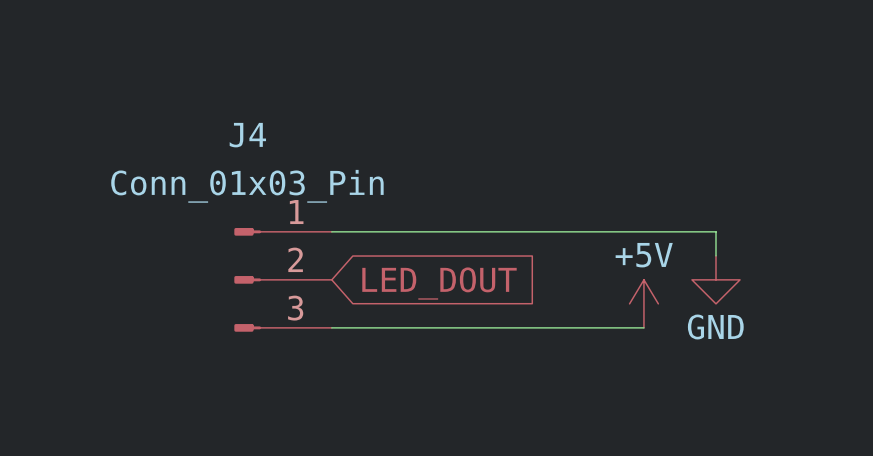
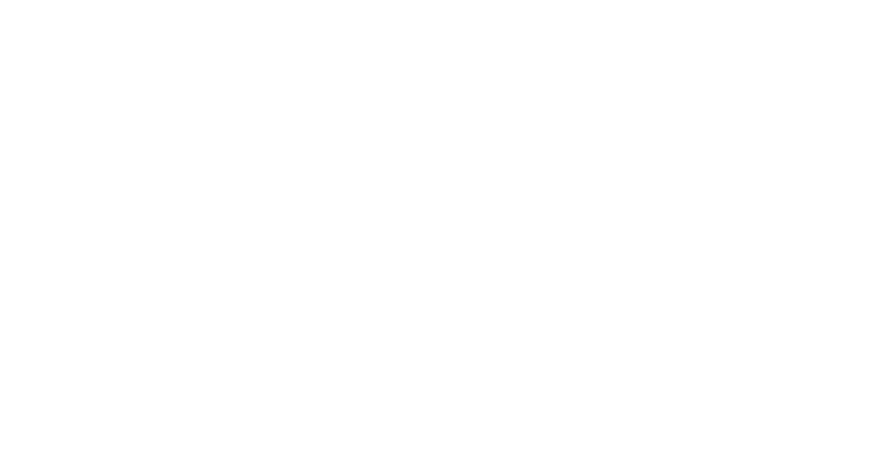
wire: (331, 231) (715, 231) (715, 255) -> none
J4: Conn_01x03_Pin (283, 279) -> none
power symbol: GND (715, 279) -> none
global label: LED_DOUT (439, 283) -> none
power symbol: +5V (643, 303) -> none
wire: (331, 327) (643, 327) -> none

